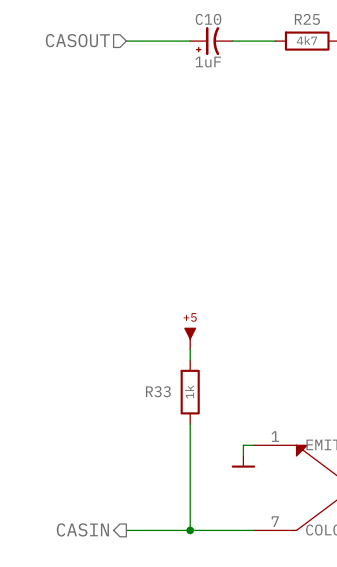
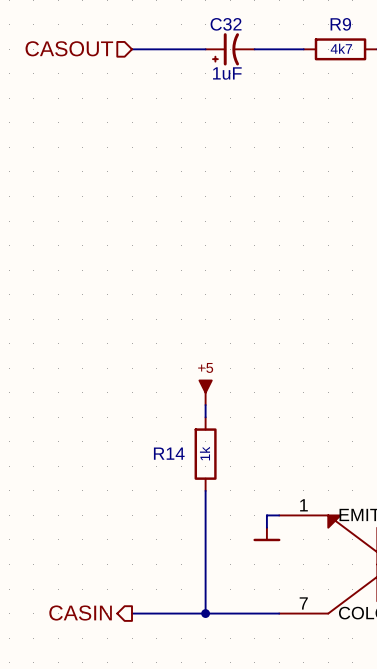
C10 name: C10 (208, 19) -> C32 (226, 24)
R25 name: R25 (307, 19) -> R9 (340, 24)
R33 name: R33 (158, 391) -> R14 (169, 453)

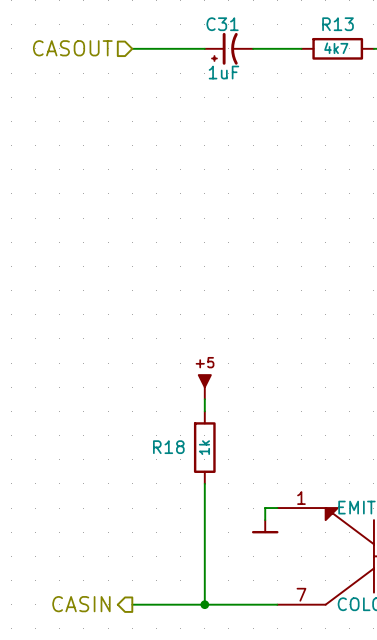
C32 name: C32 (226, 24) -> C31 (222, 24)
R9 name: R9 (340, 24) -> R13 (338, 24)
R14 name: R14 (169, 453) -> R18 (168, 447)

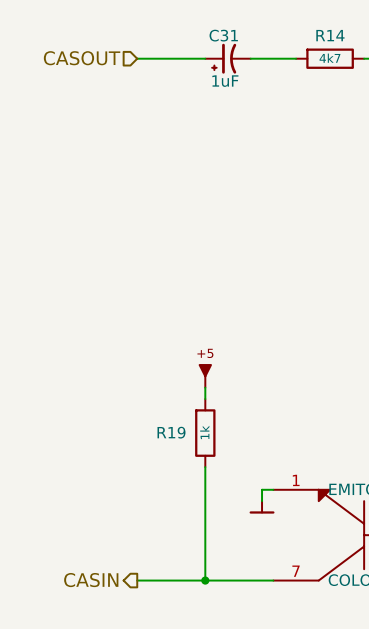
R13 name: R13 (338, 24) -> R14 (330, 35)
R18 name: R18 (168, 447) -> R19 (171, 432)

